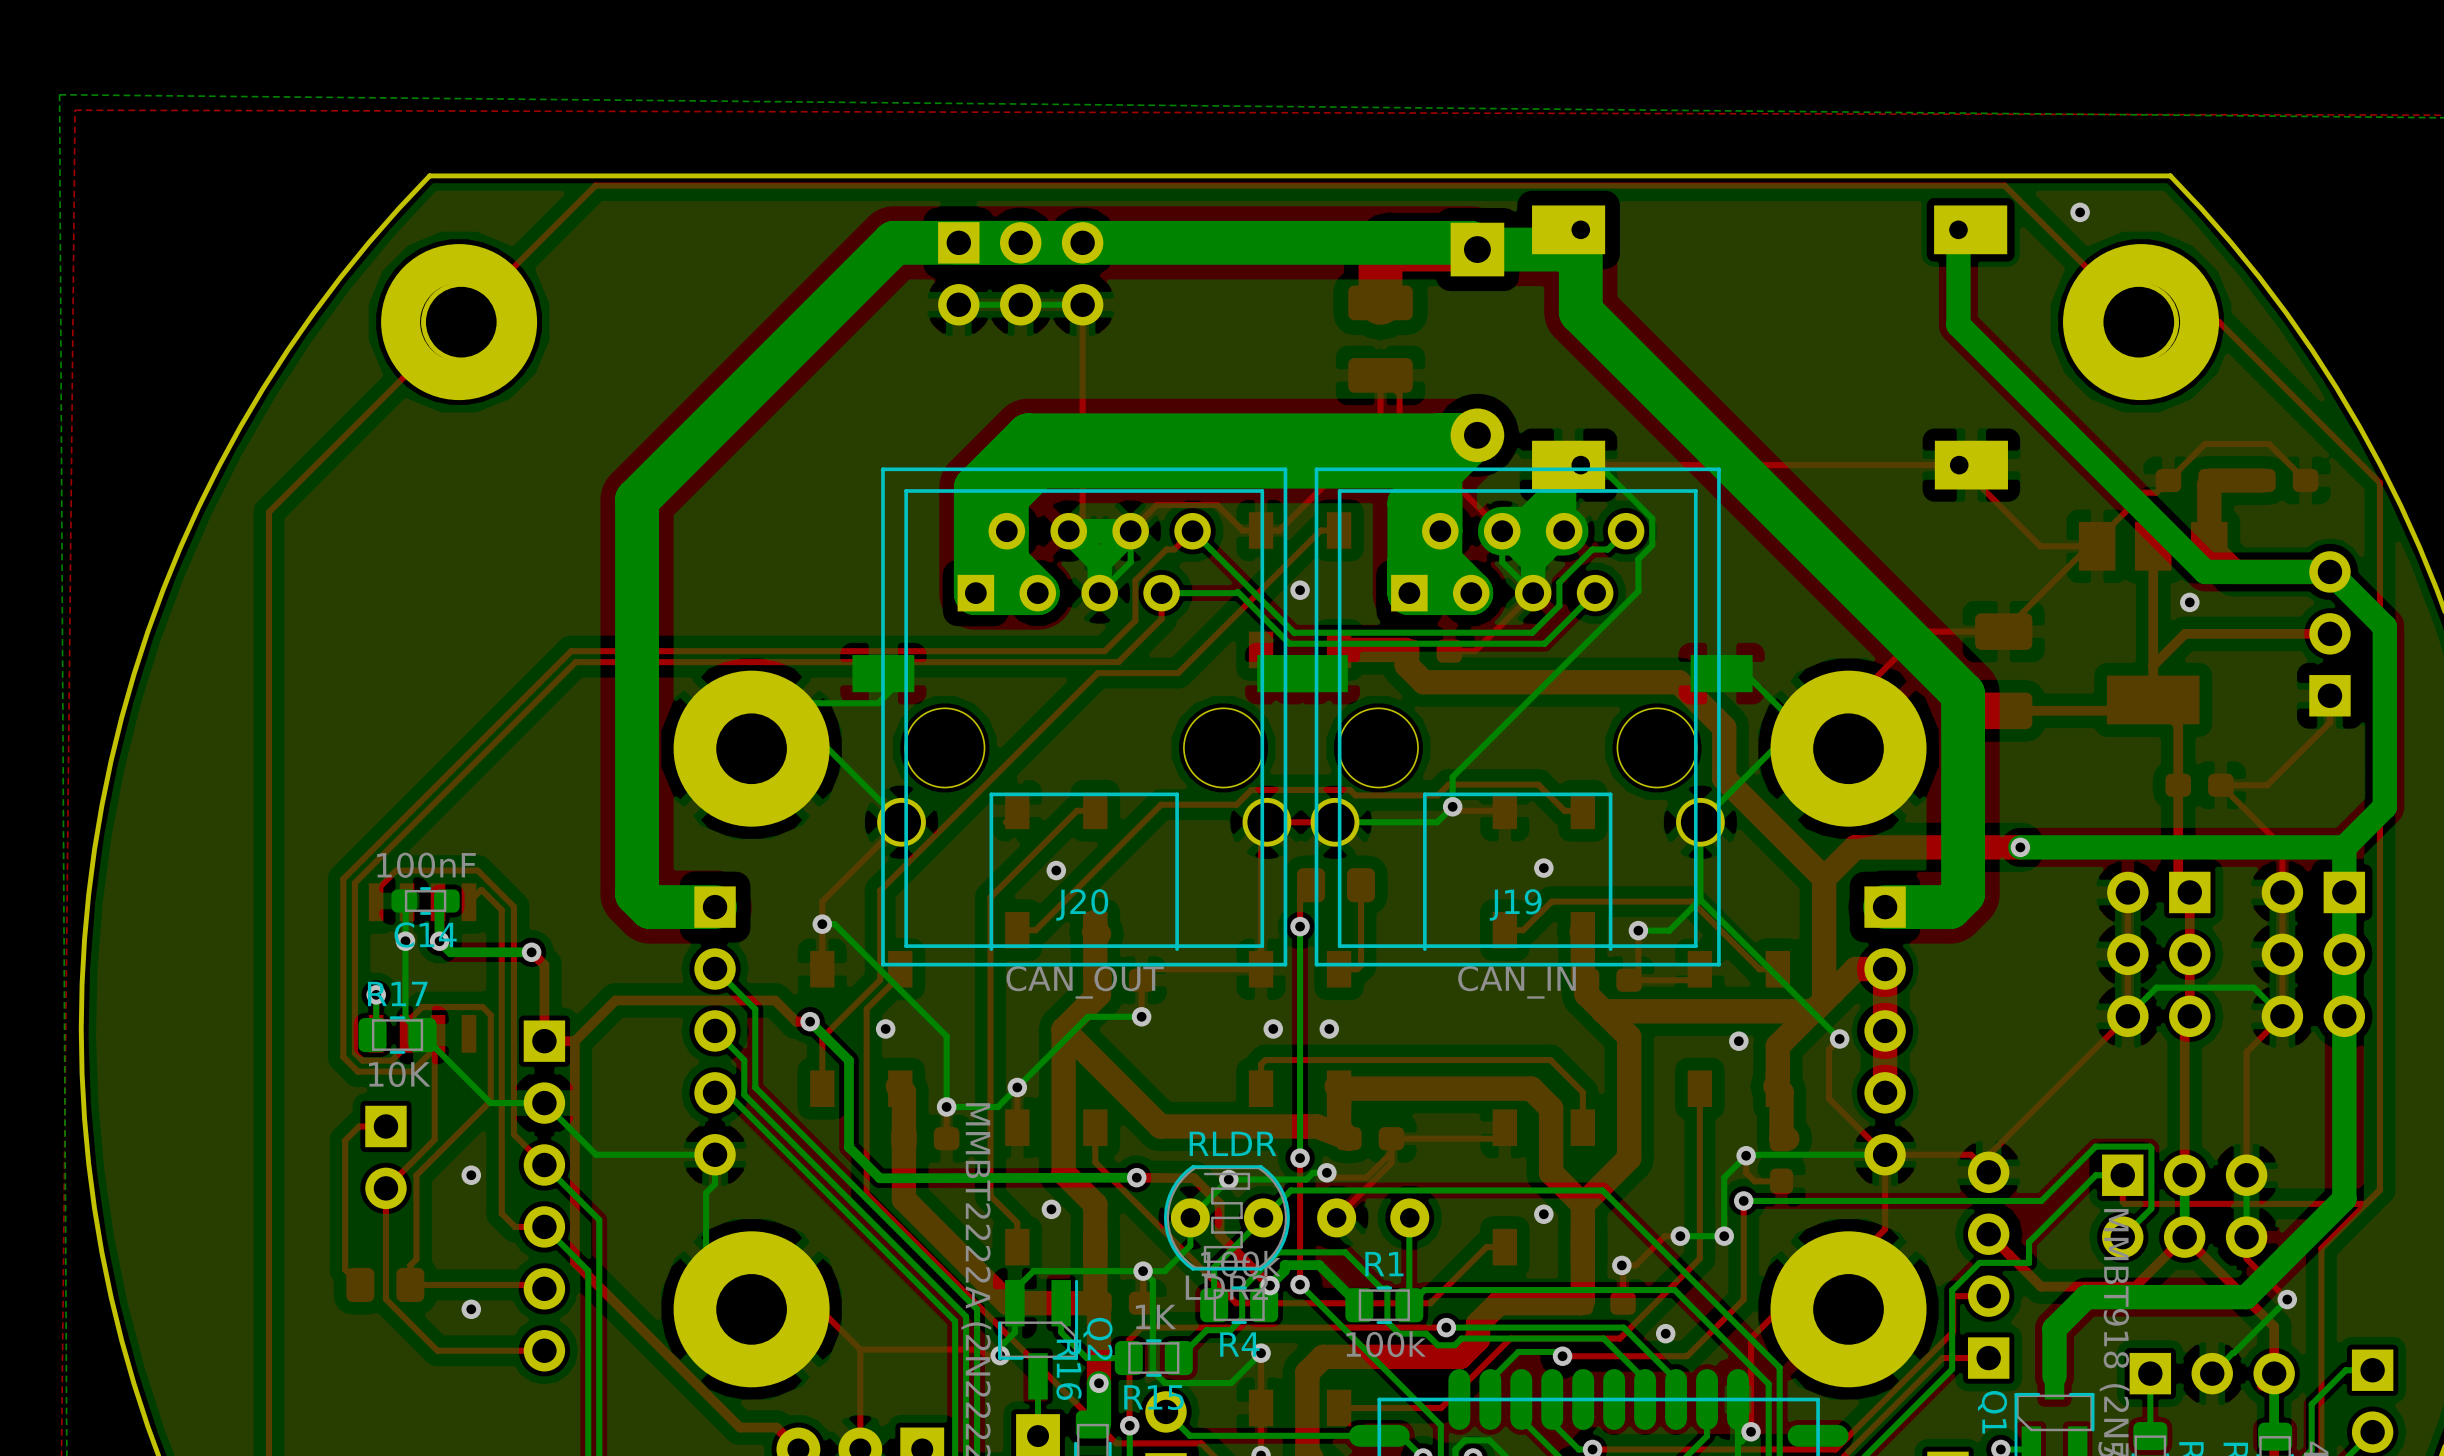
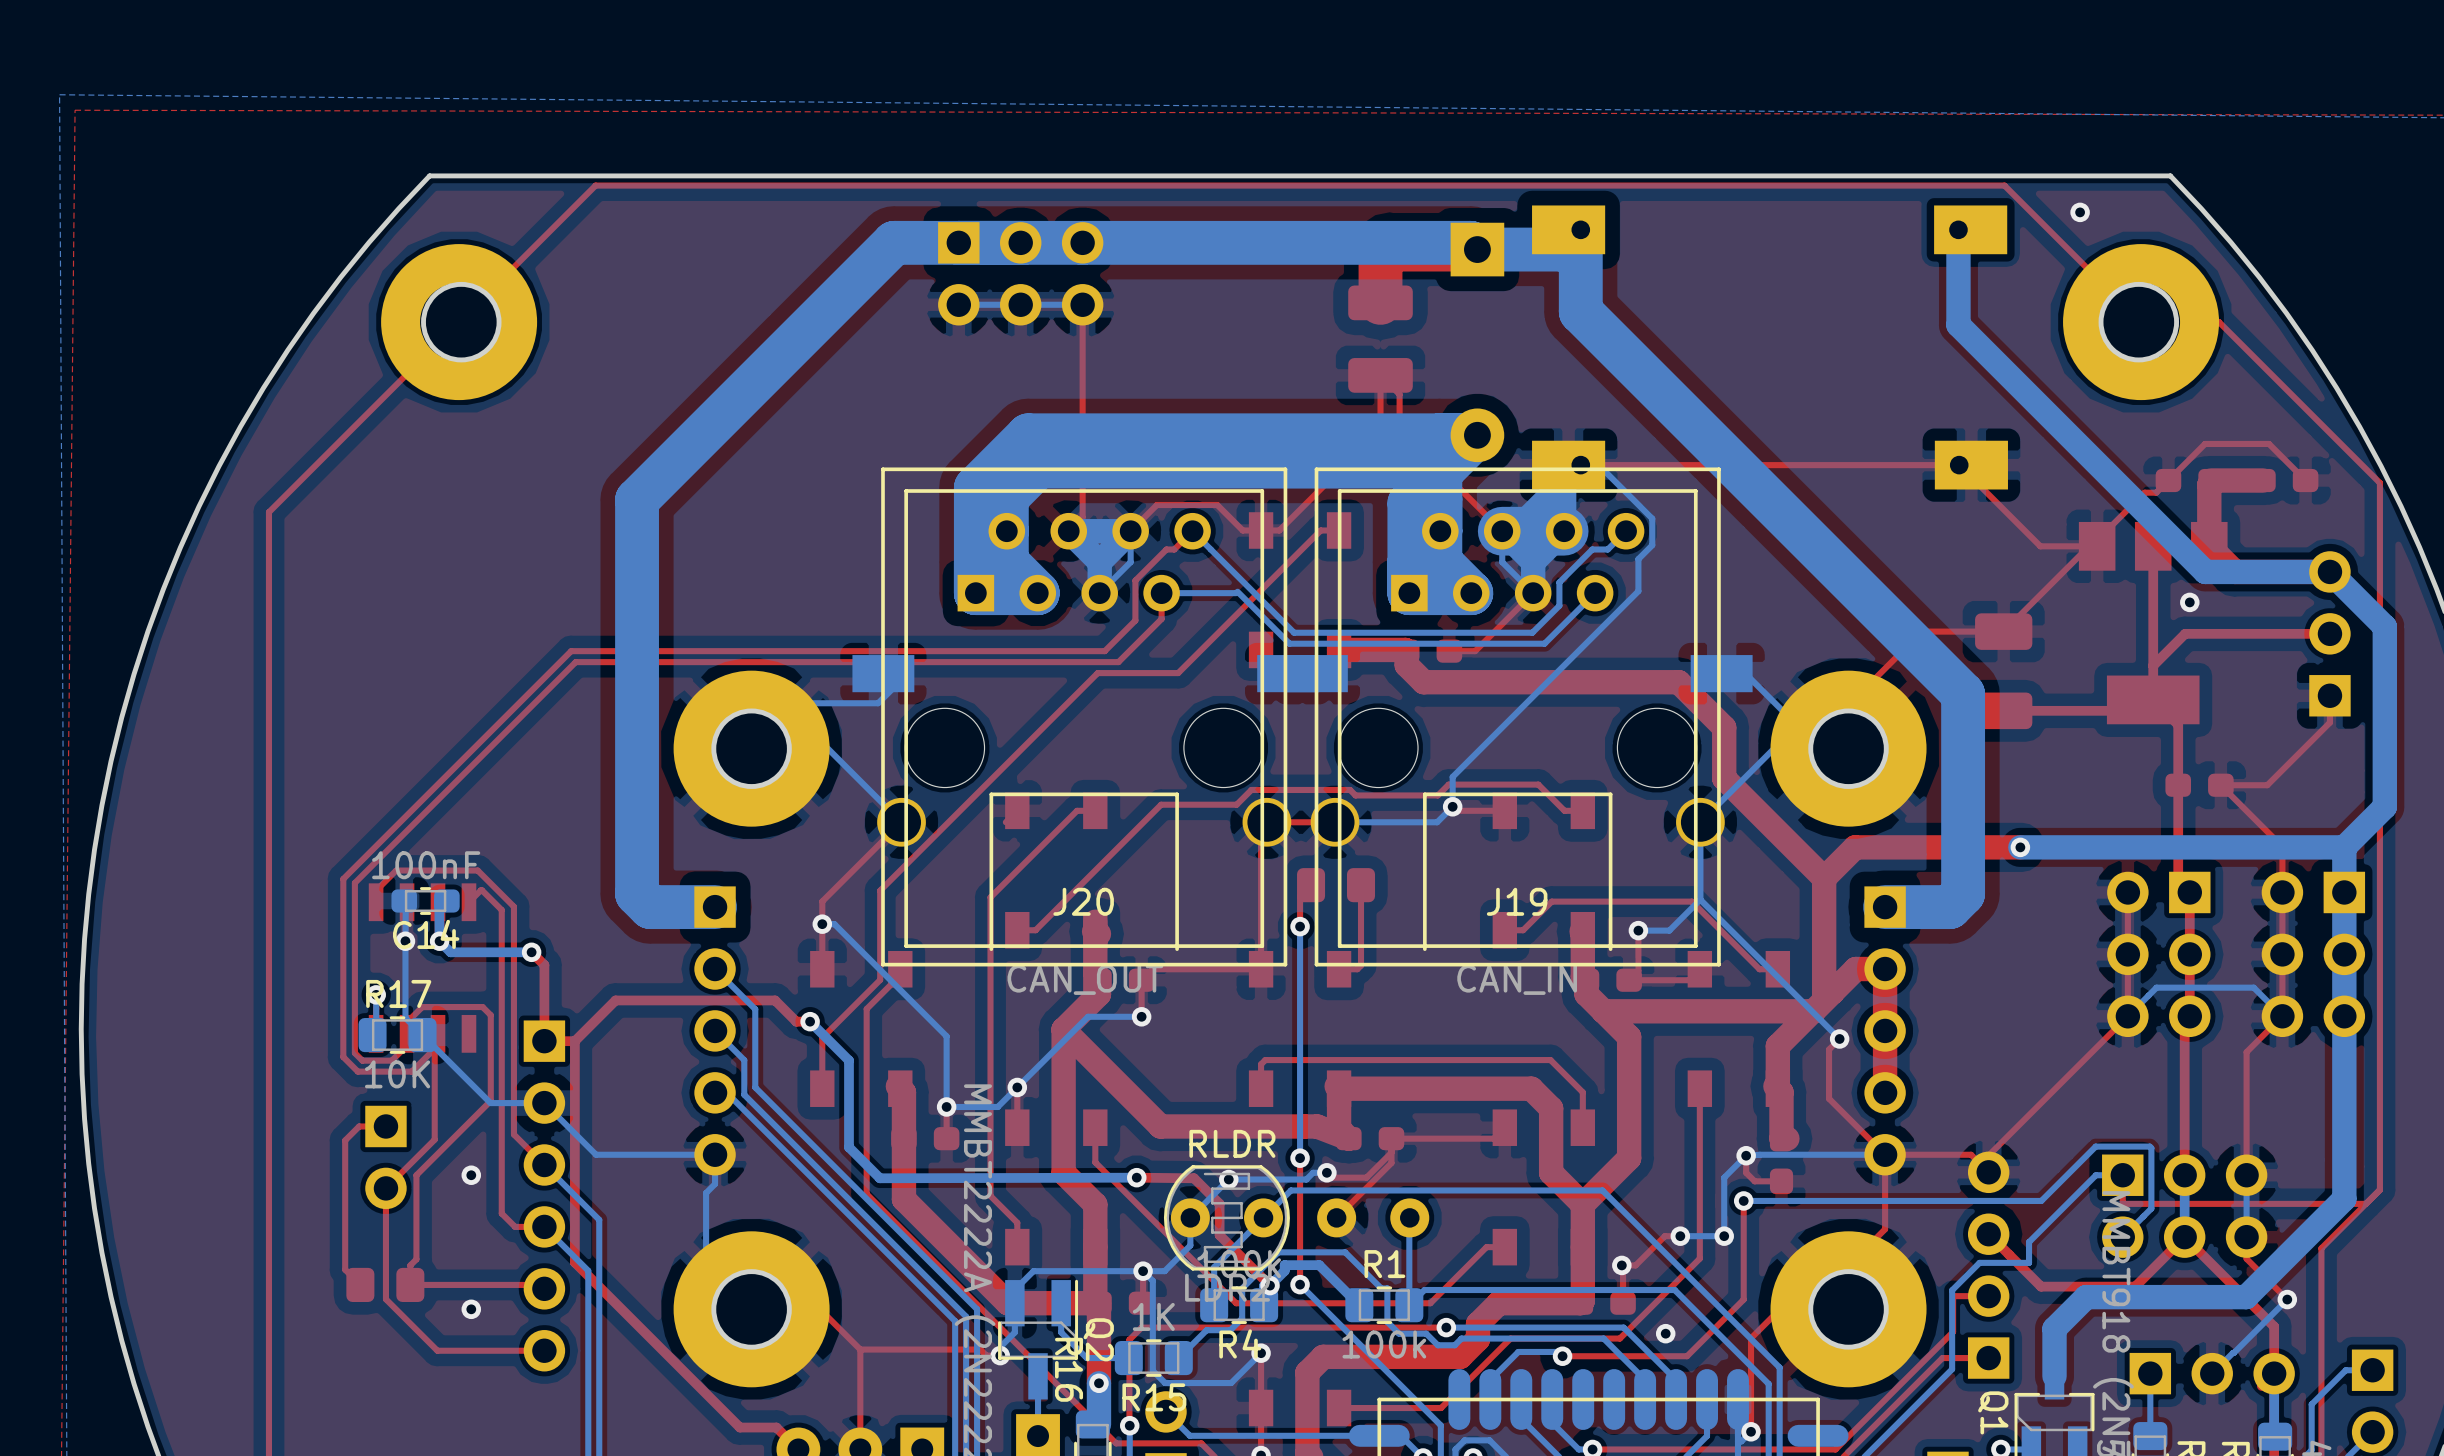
via: (1300, 590) -> none
via: (1543, 868) -> none
via: (1056, 870) -> none
via: (885, 1028) -> none
via: (1273, 1028) -> none
via: (1329, 1028) -> none
via: (1738, 1041) -> none
via: (1051, 1209) -> none
via: (1543, 1214) -> none

